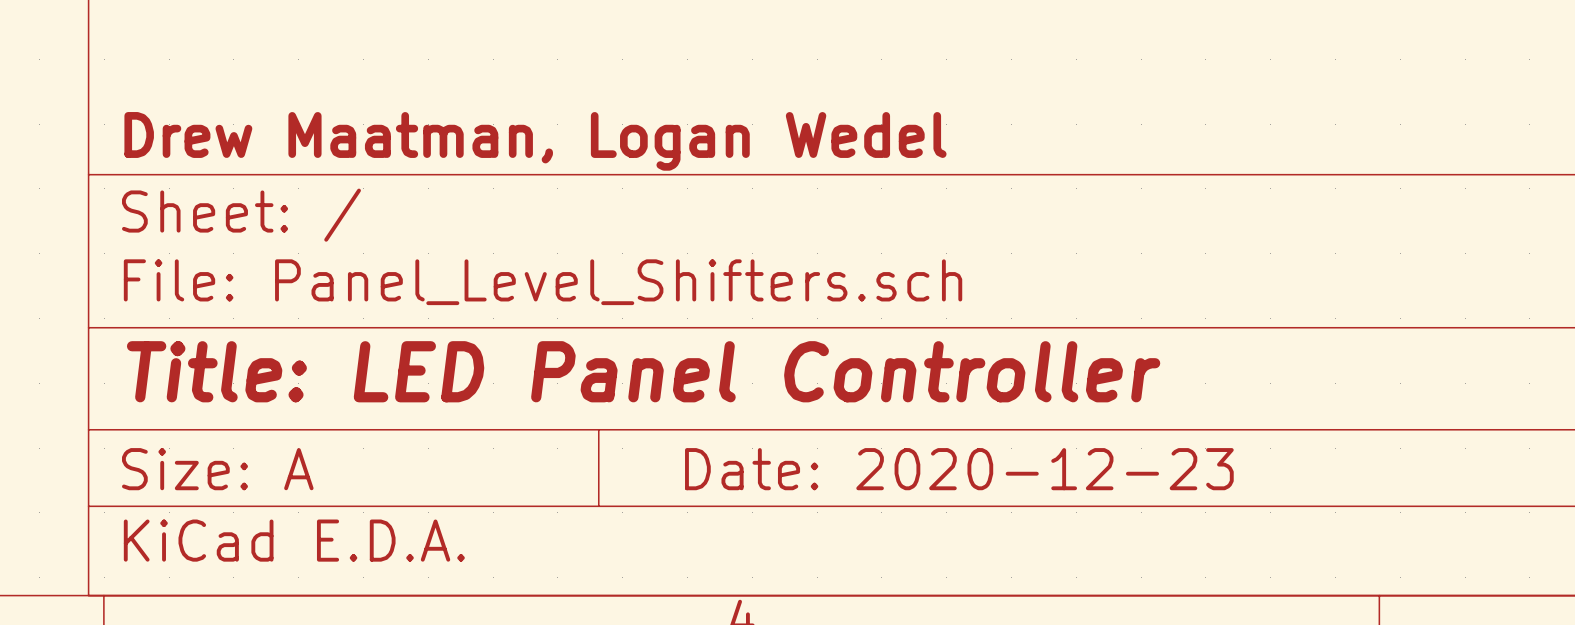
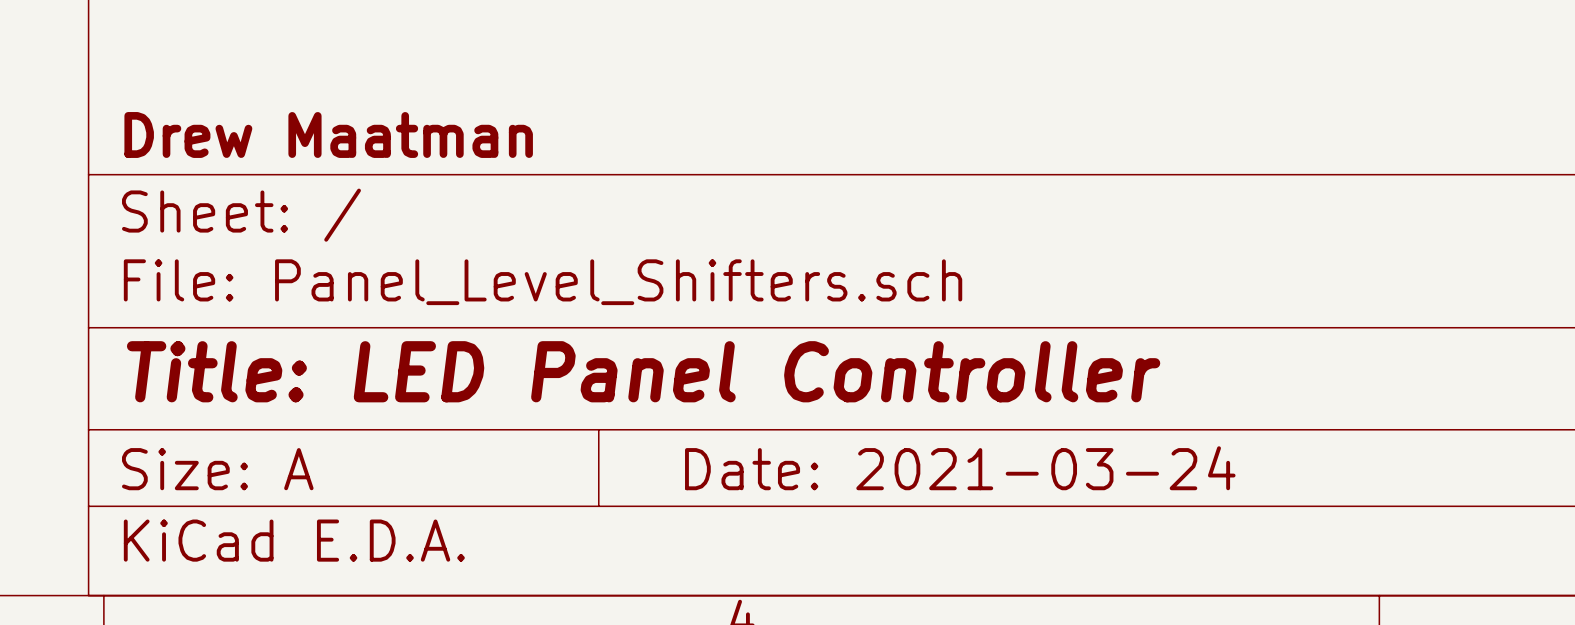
title block: Drew Maatman, Logan Wedel (535, 141) -> Drew Maatman (328, 134)
title block: Date: 2020-12-23 (959, 469) -> Date: 2021-03-24 (960, 468)

